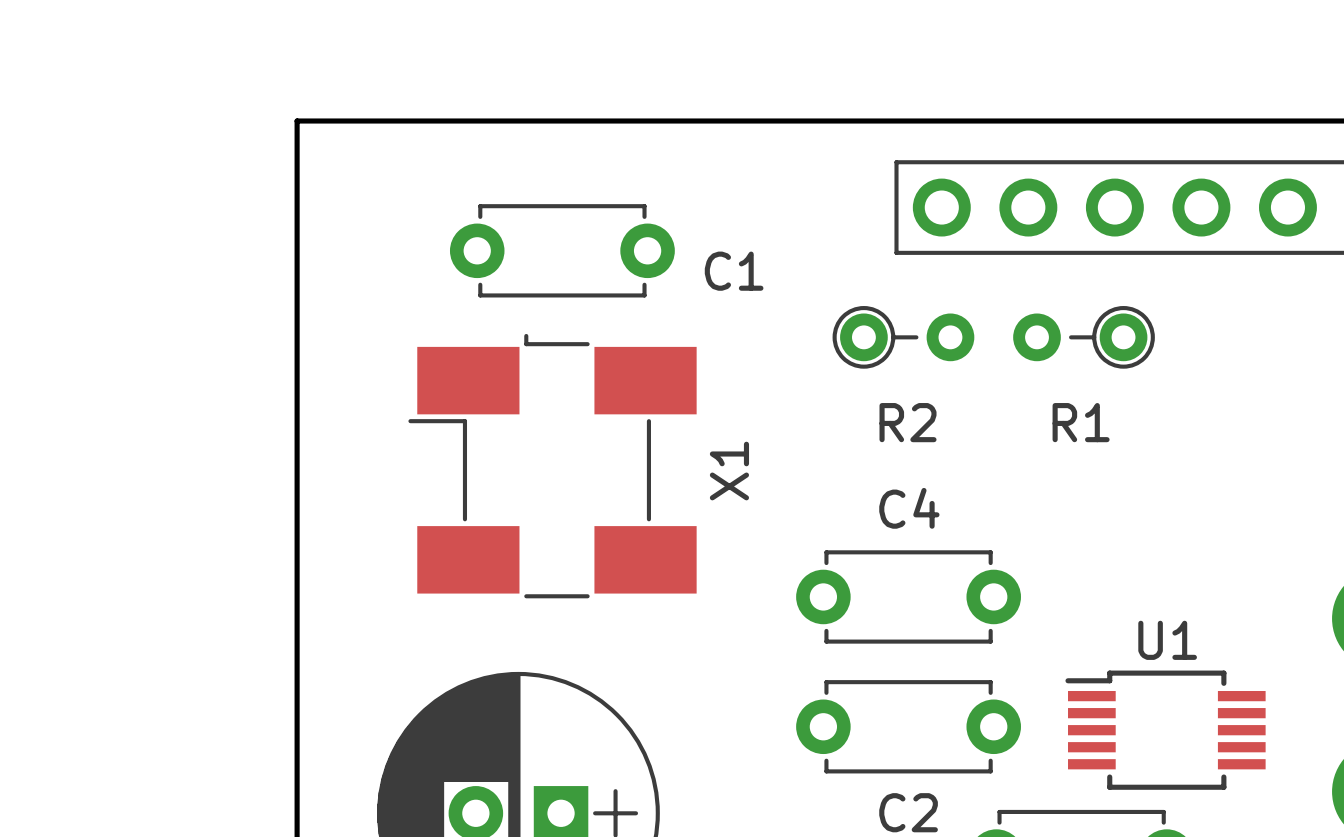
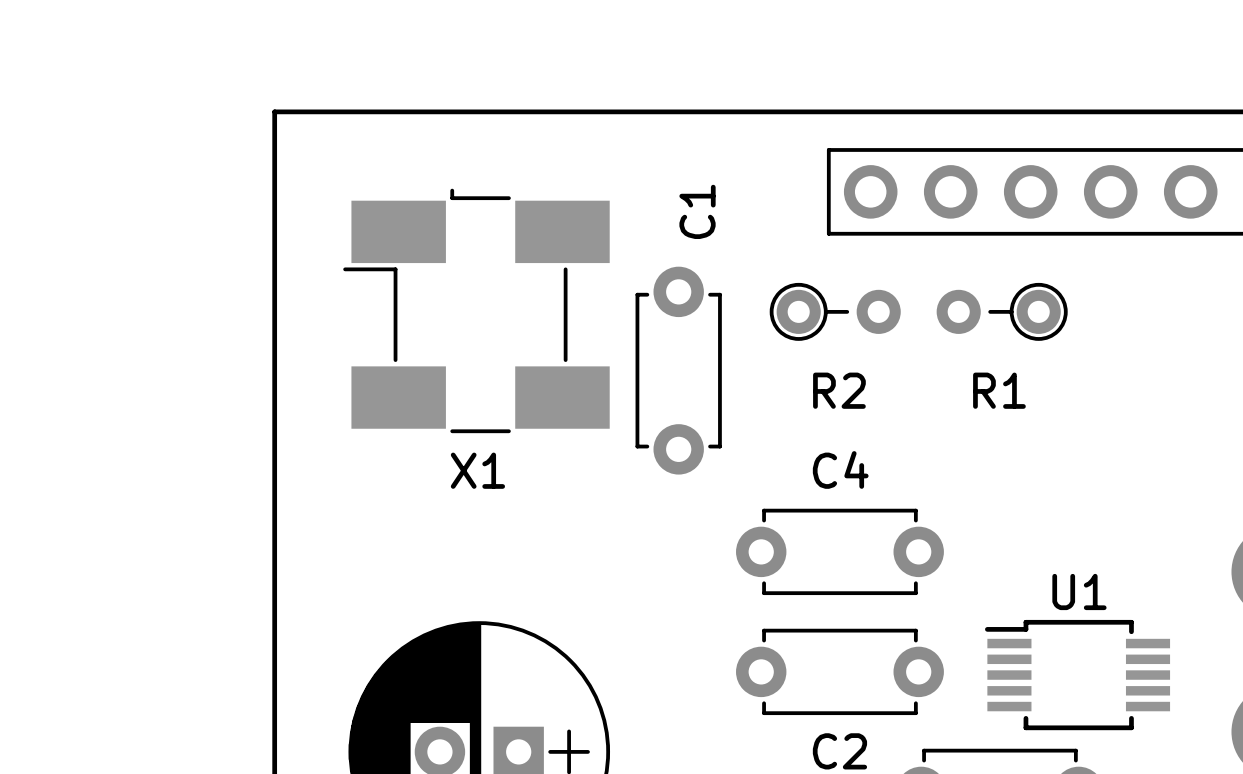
C1 rotation: 0° (562, 250) -> 90° clockwise (678, 370)
C1 position: (562, 250) -> (678, 370)
C1 name position: C1 (734, 271) -> C1 (697, 211)
X1 position: (552, 466) -> (476, 310)
X1 name rotation: 0° (729, 471) -> 90° clockwise (477, 470)
X1 name position: X1 (729, 471) -> X1 (477, 470)

